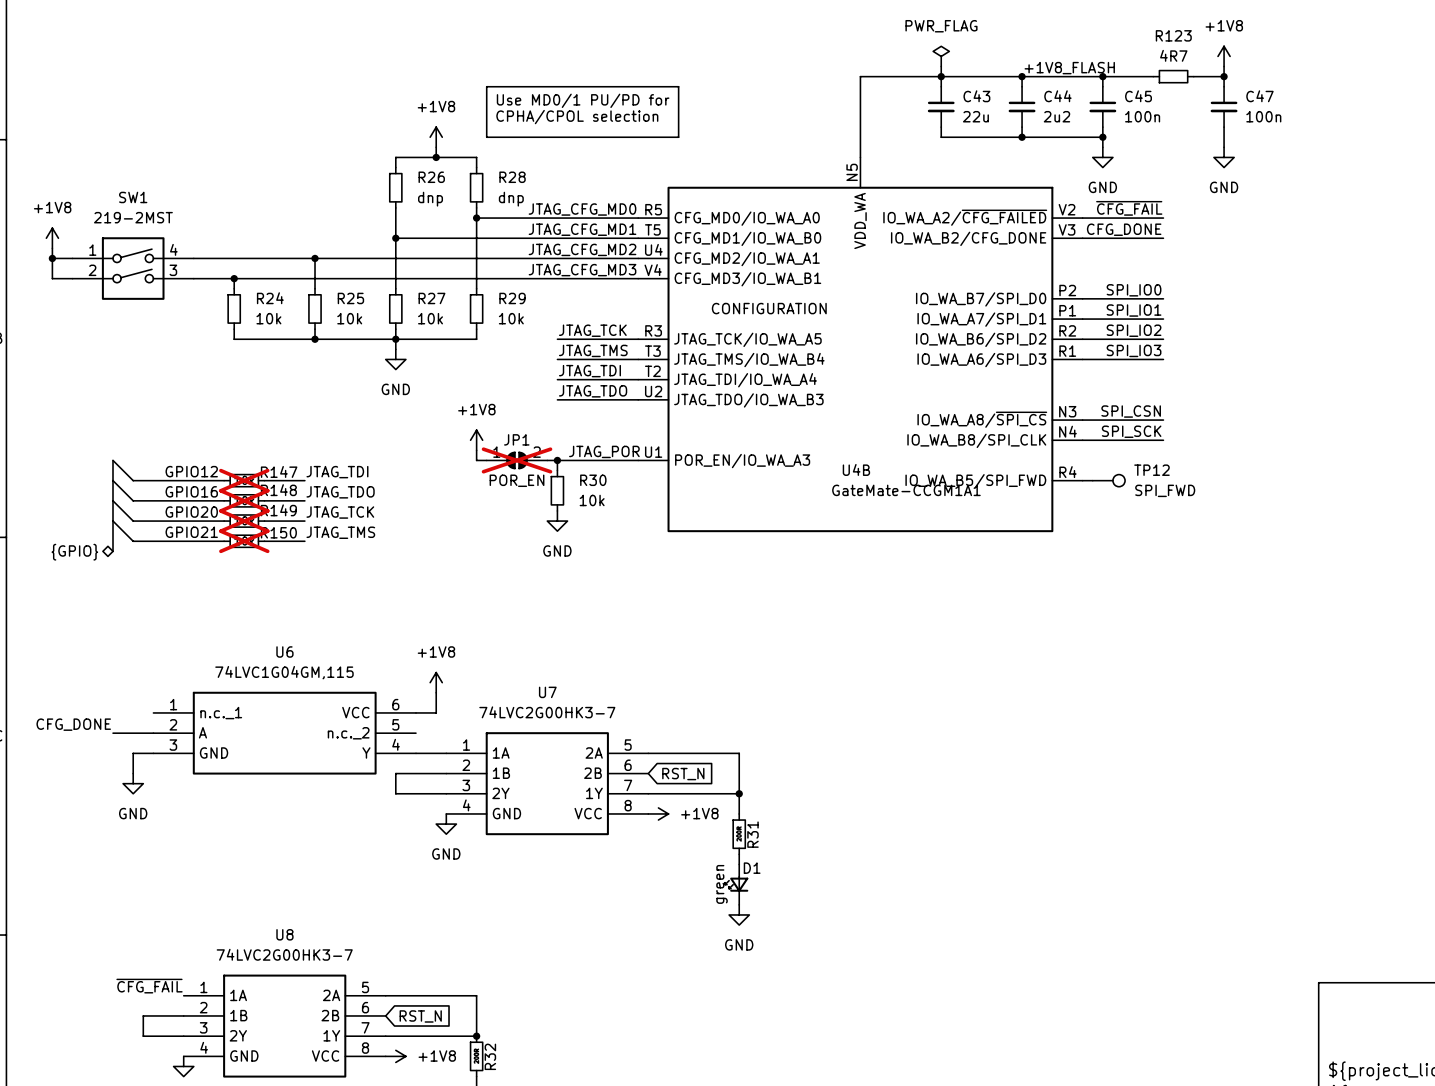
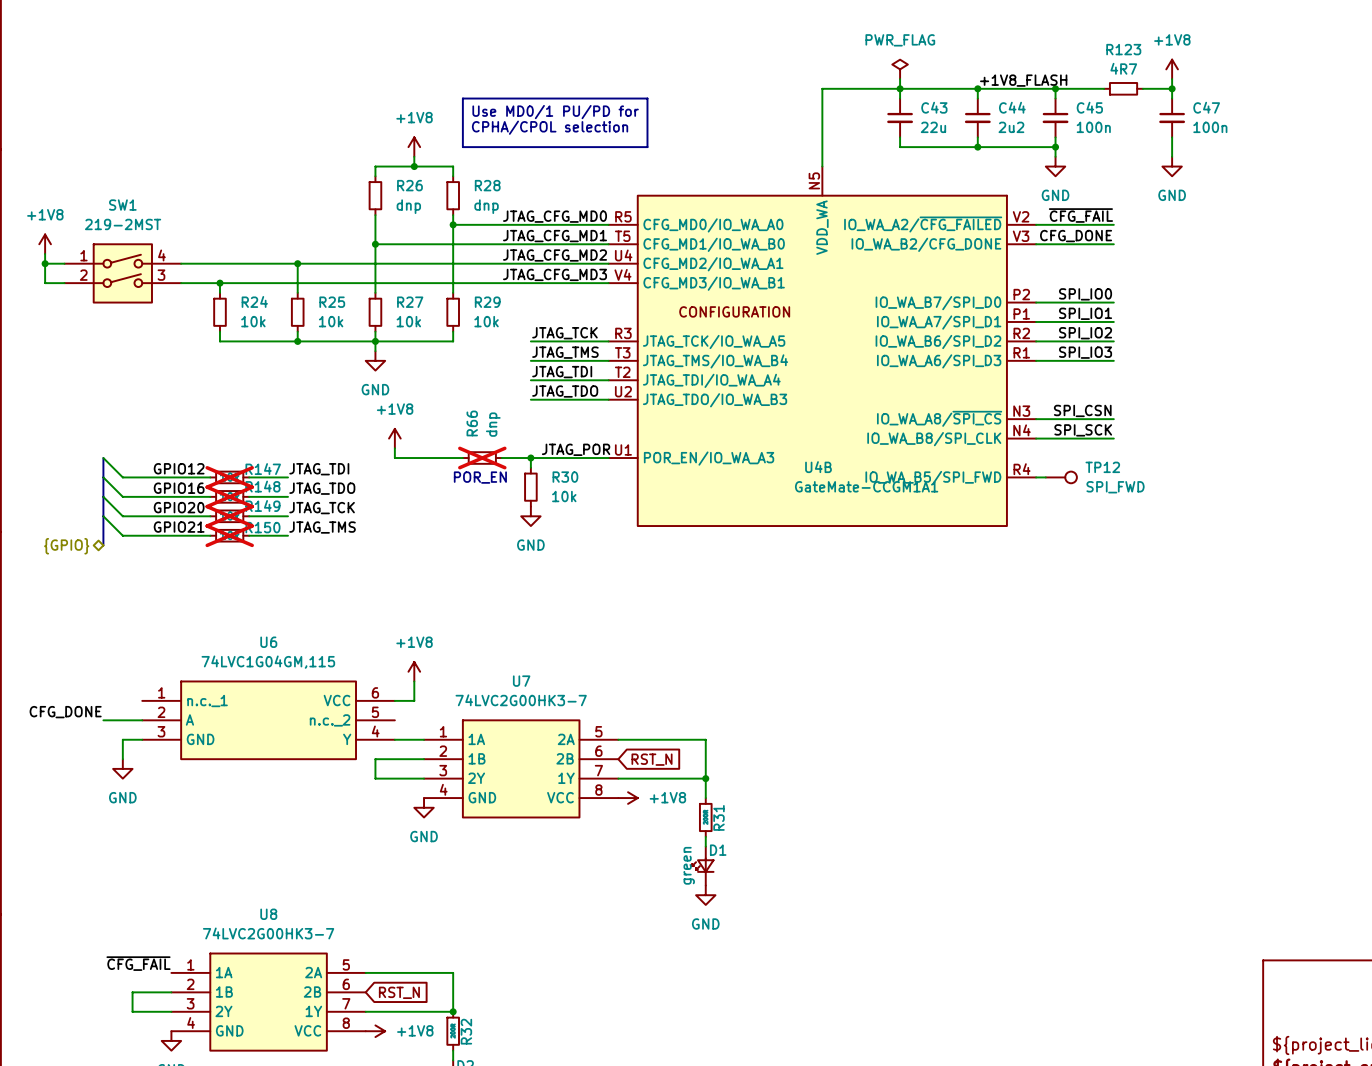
power symbol position: +1V8 (476, 440) -> +1V8 (394, 438)
wire: (476, 450) (476, 460) -> (394, 448) (394, 458) (453, 458)
R66: none -> dnp (482, 458)
JP1: POR_EN (517, 460) -> none
text: none -> POR_EN (480, 477)

